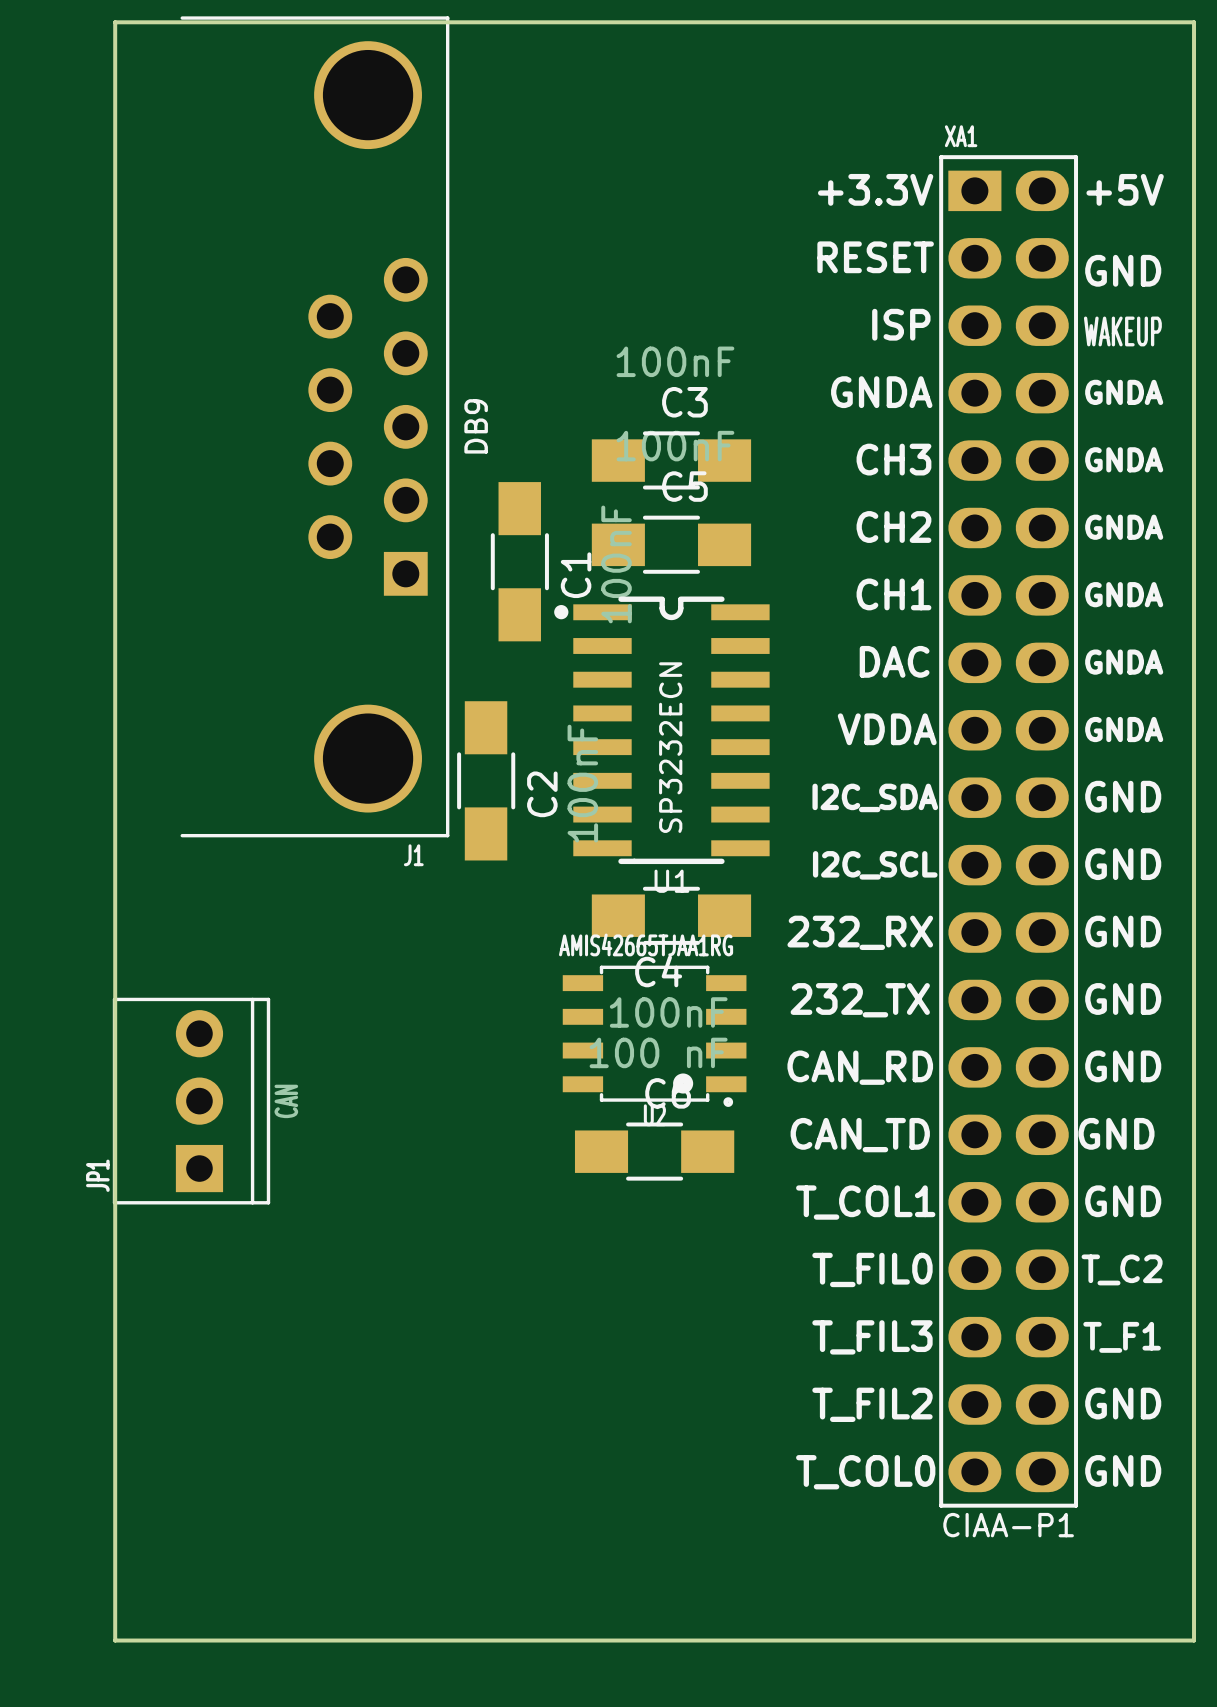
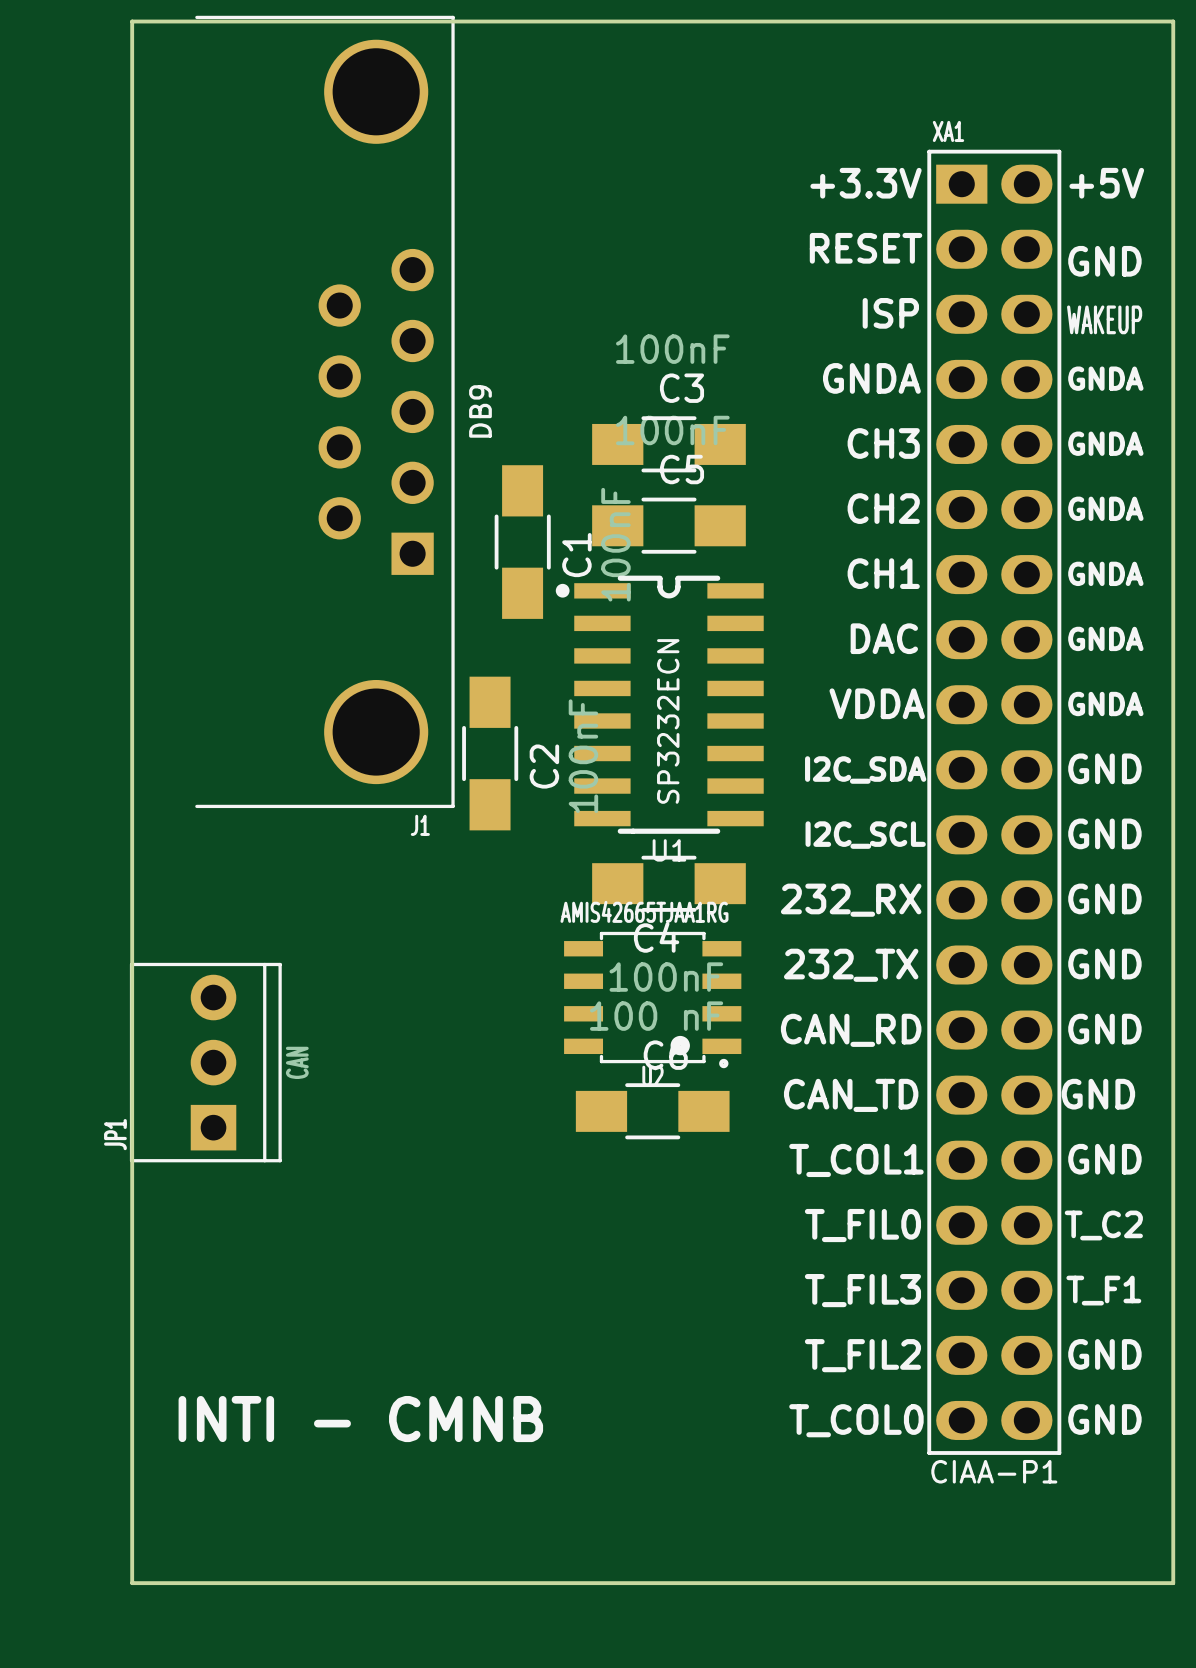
text: none -> INTI - CMNB (360, 1419)

